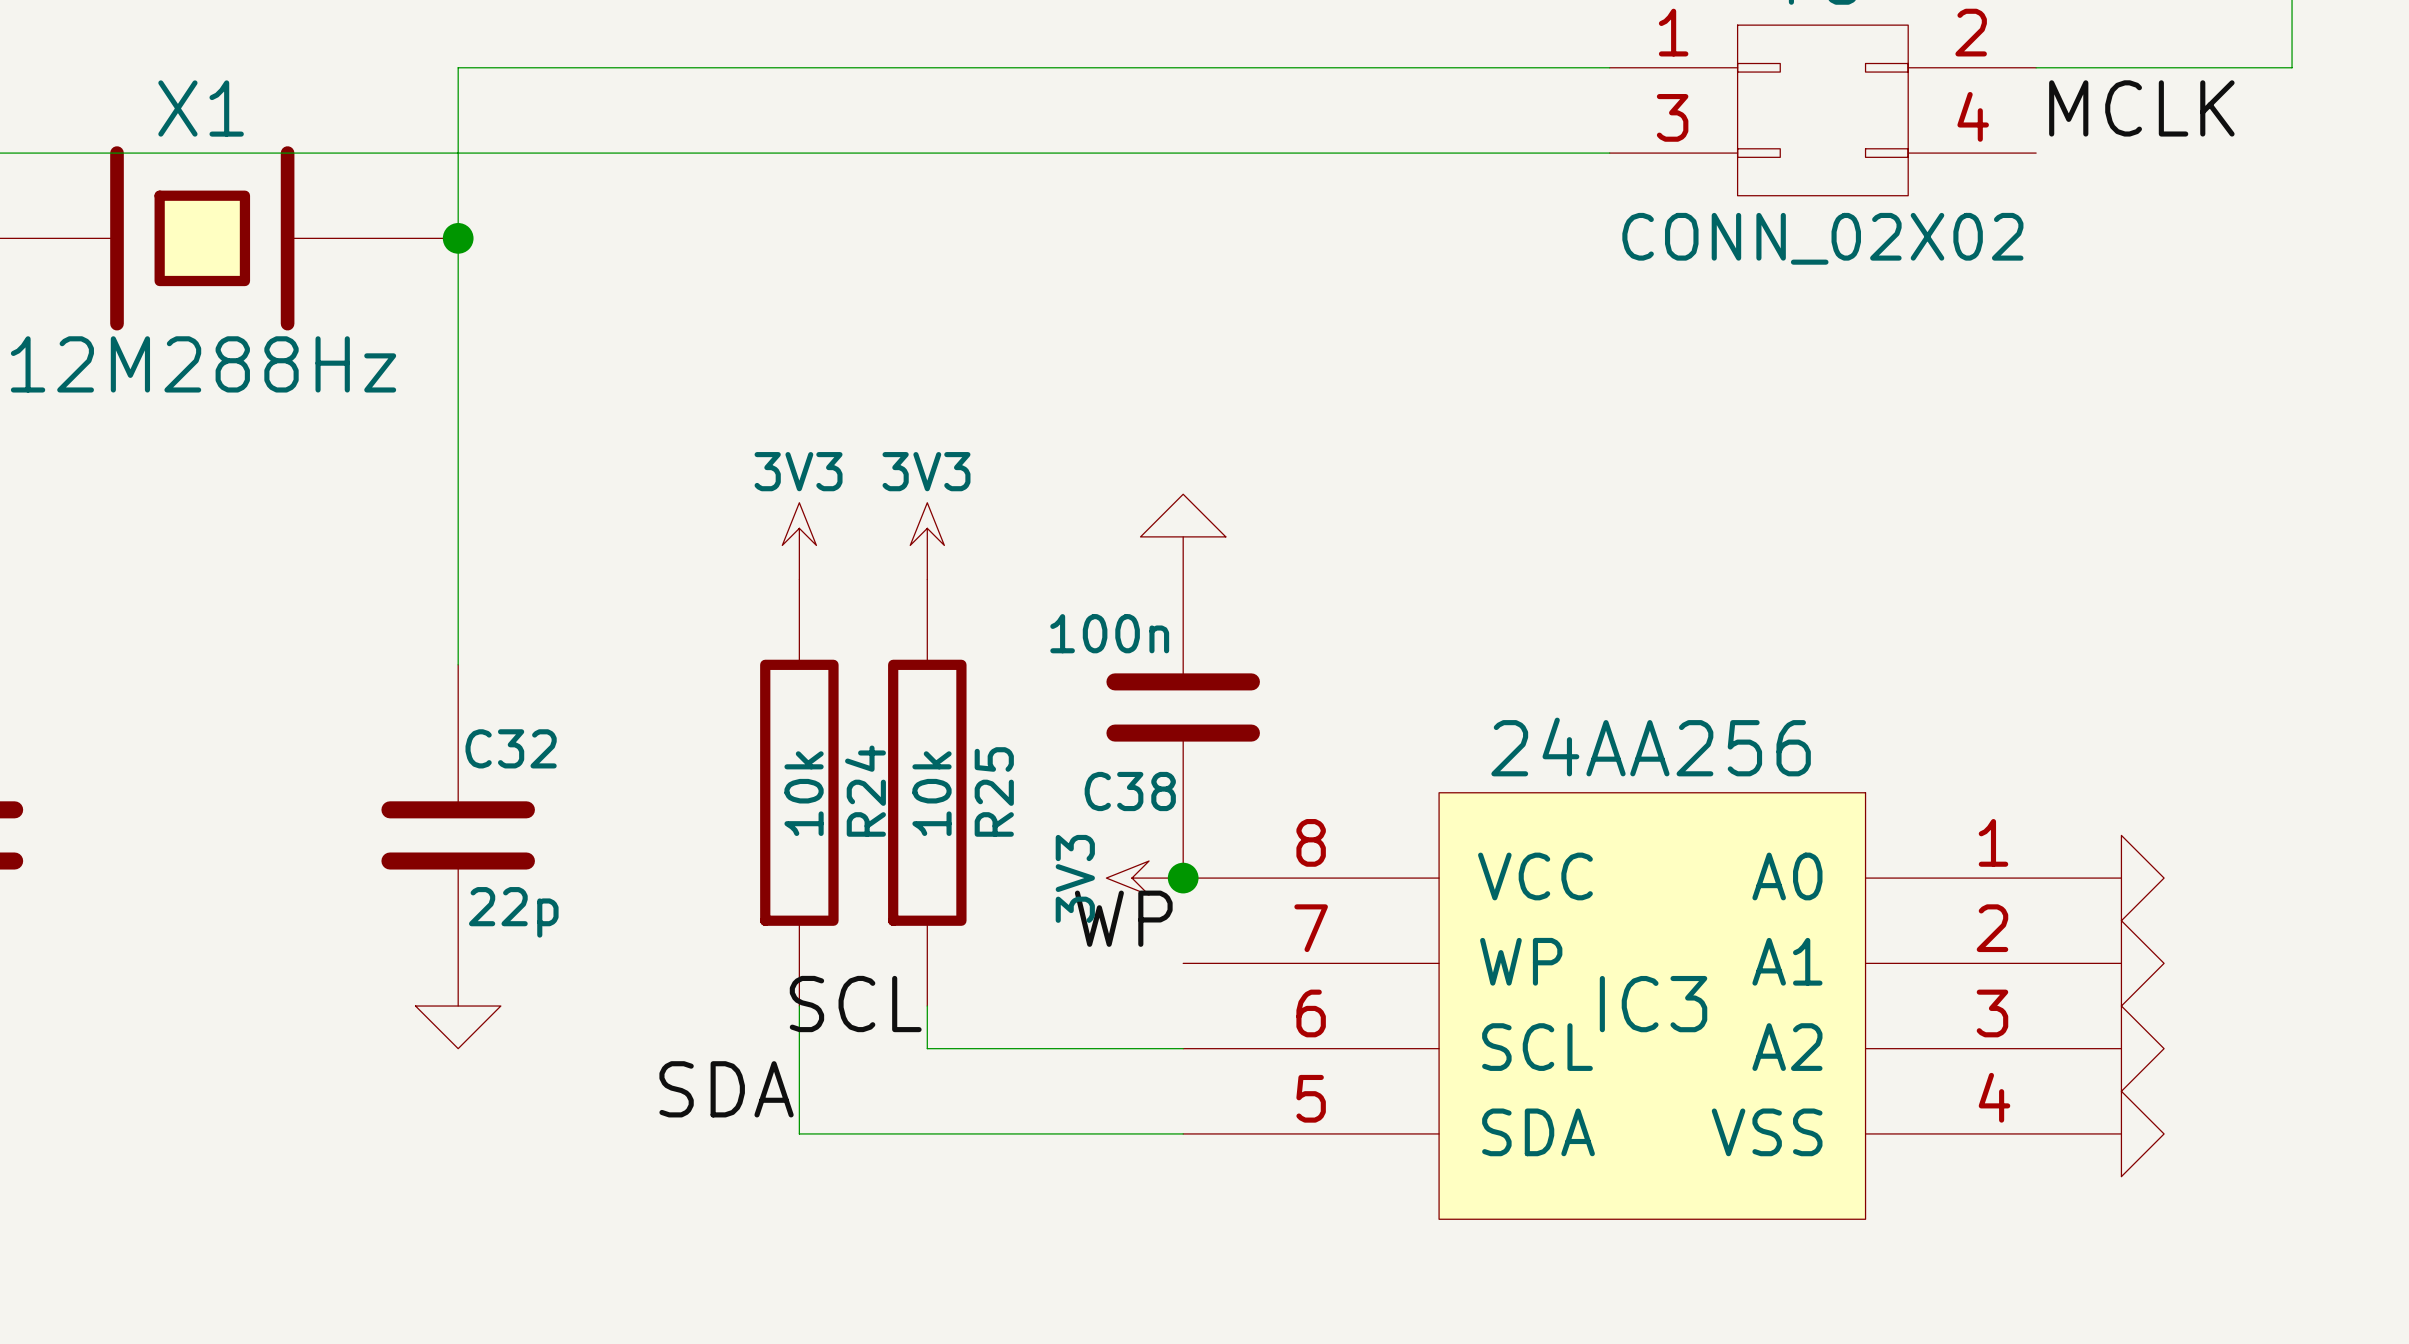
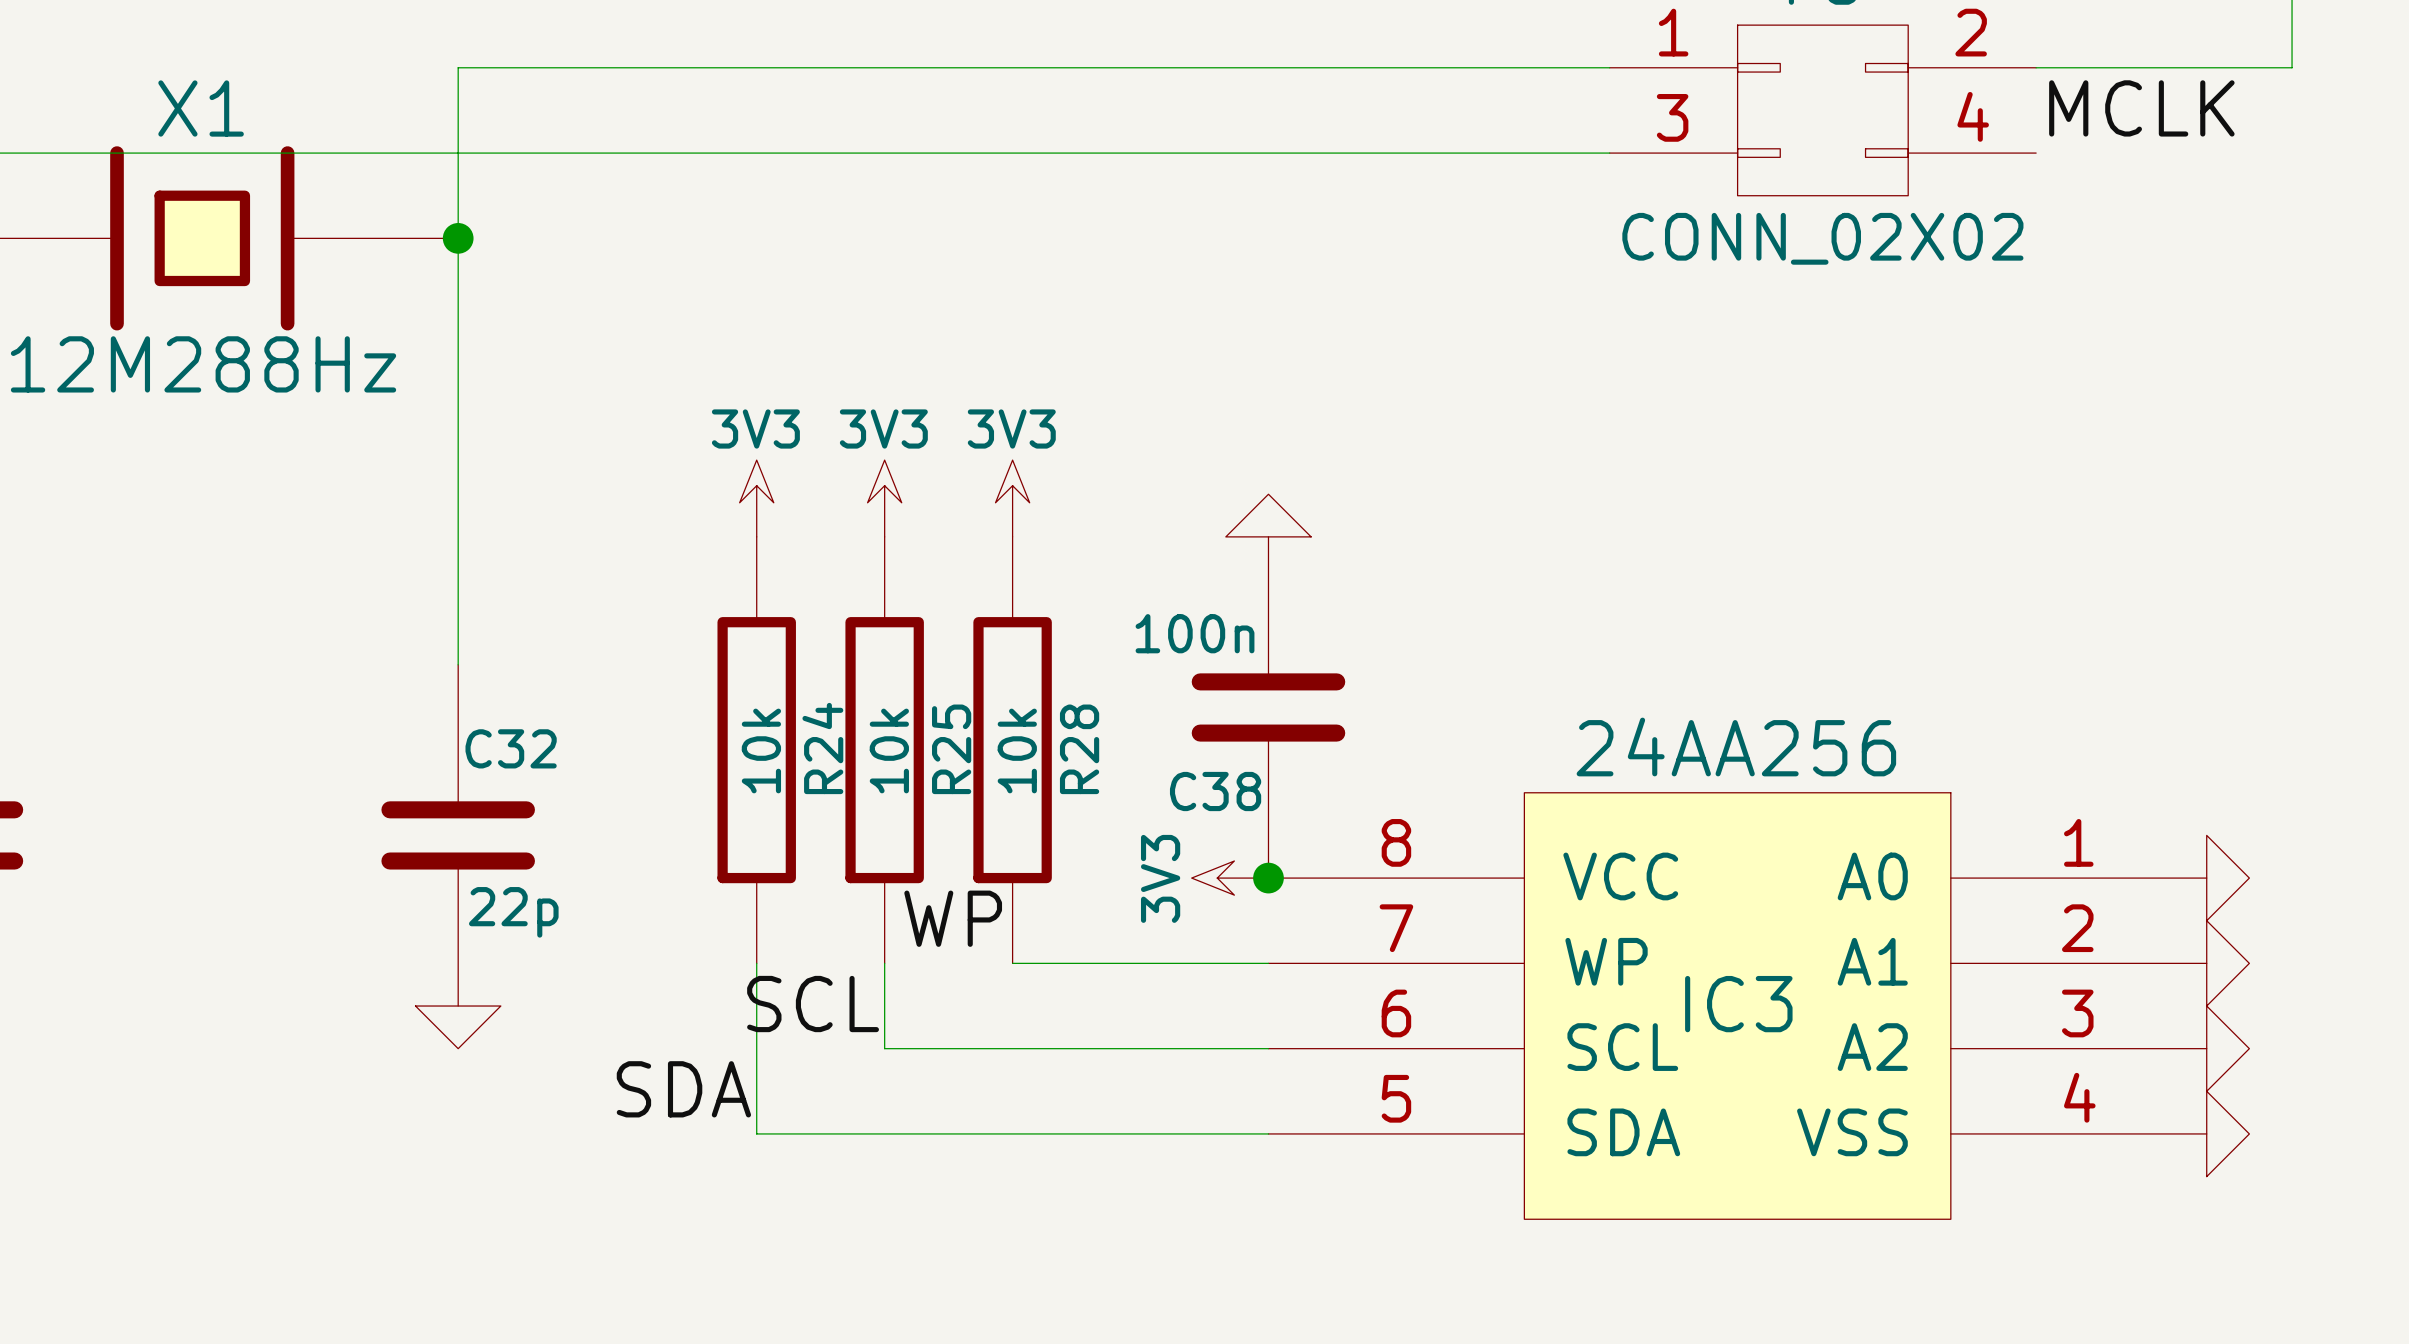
power symbol: none -> 3V3 (756, 498)
power symbol: none -> 3V3 (884, 498)
power symbol: none -> 3V3 (1012, 498)
power symbol position: (1183, 515) -> (1268, 515)
power symbol: 3V3 (799, 541) -> none
power symbol: 3V3 (927, 541) -> none
C38 position: (1183, 707) -> (1268, 707)
R28: none -> 10k (1012, 750)
R24 position: (799, 792) -> (756, 750)
R25 position: (927, 792) -> (884, 750)
power symbol position: 3V3 (1144, 878) -> 3V3 (1230, 878)
junction position: (1183, 878) -> (1268, 878)
power symbol: (2142, 878) -> none
power symbol: none -> (2228, 878)
label position: WP (1123, 918) -> WP (953, 918)
wire: none -> (1012, 963) (1268, 963)
power symbol: (2142, 963) -> none
power symbol: none -> (2228, 963)
label position: SCL (855, 1004) -> SCL (813, 1004)
wire: (799, 1006) (799, 1133) -> (756, 963) (756, 1133) (799, 1133)
wire: (927, 1006) (927, 1048) -> (884, 963) (884, 1048) (927, 1048)
IC3 position: (1652, 1006) -> (1737, 1006)
power symbol: (2142, 1048) -> none
power symbol: none -> (2228, 1048)
label position: SDA (726, 1089) -> SDA (683, 1089)
power symbol: (2142, 1133) -> none
power symbol: none -> (2228, 1133)

